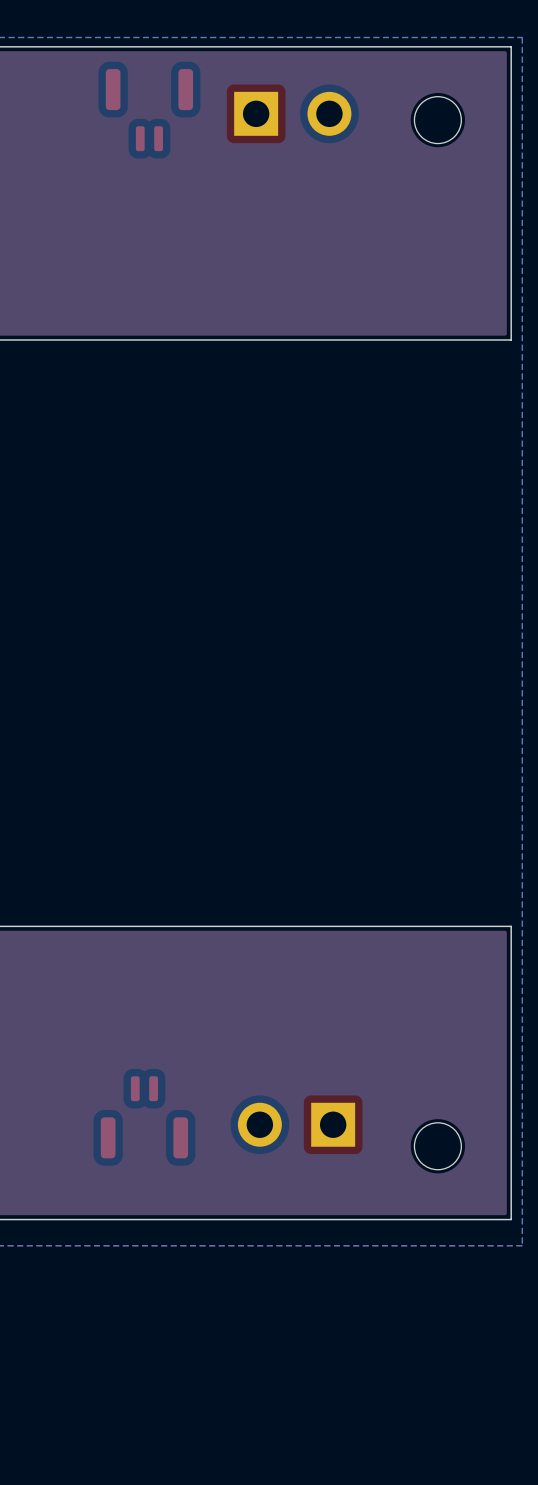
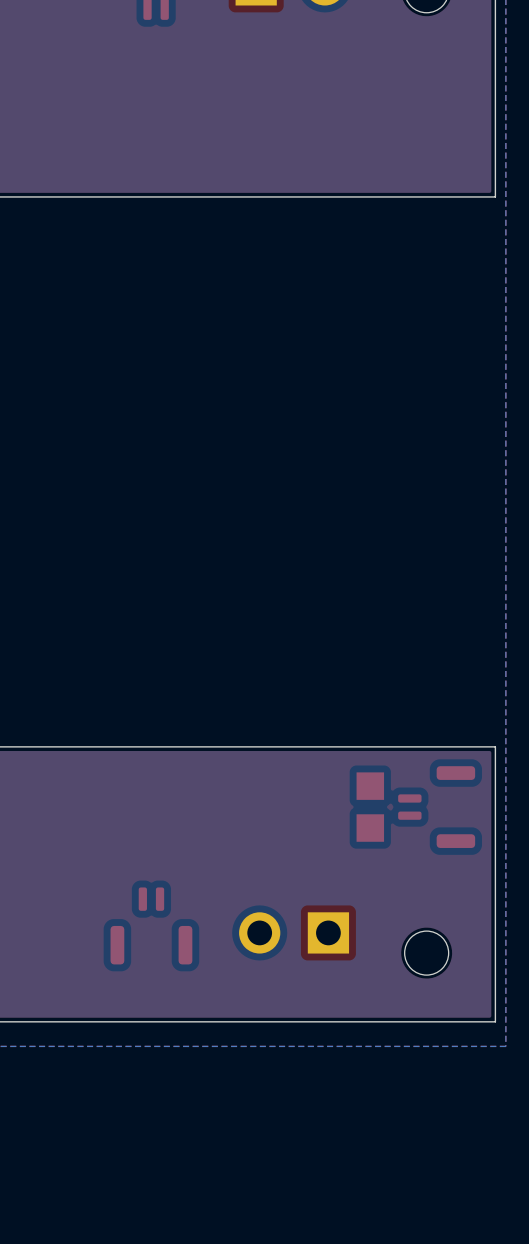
part: none -> (370, 786)
part: none -> (436, 807)
part: none -> (370, 828)

